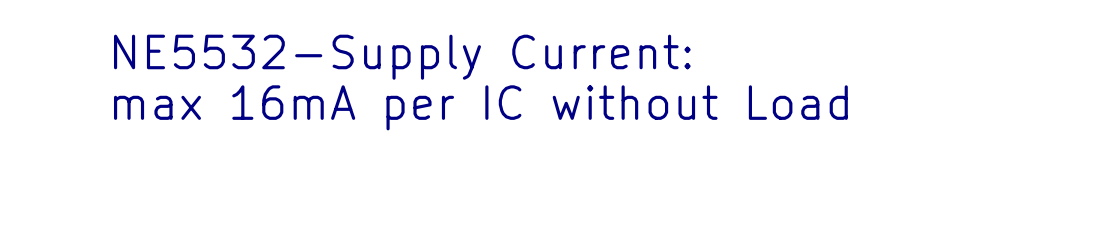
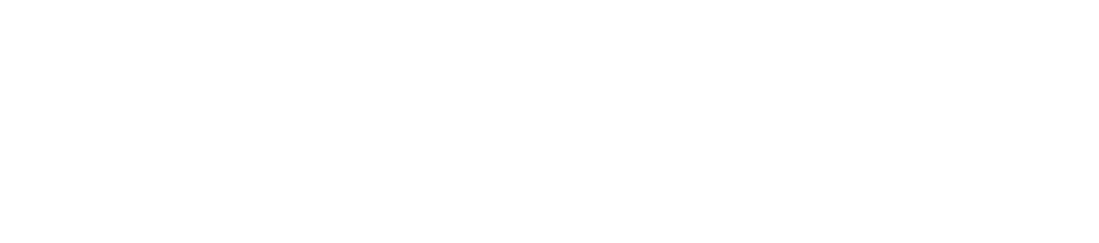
text: NE5532-Supply Current: (402, 57) -> none
text: max 16mA per IC without Load (480, 107) -> none

